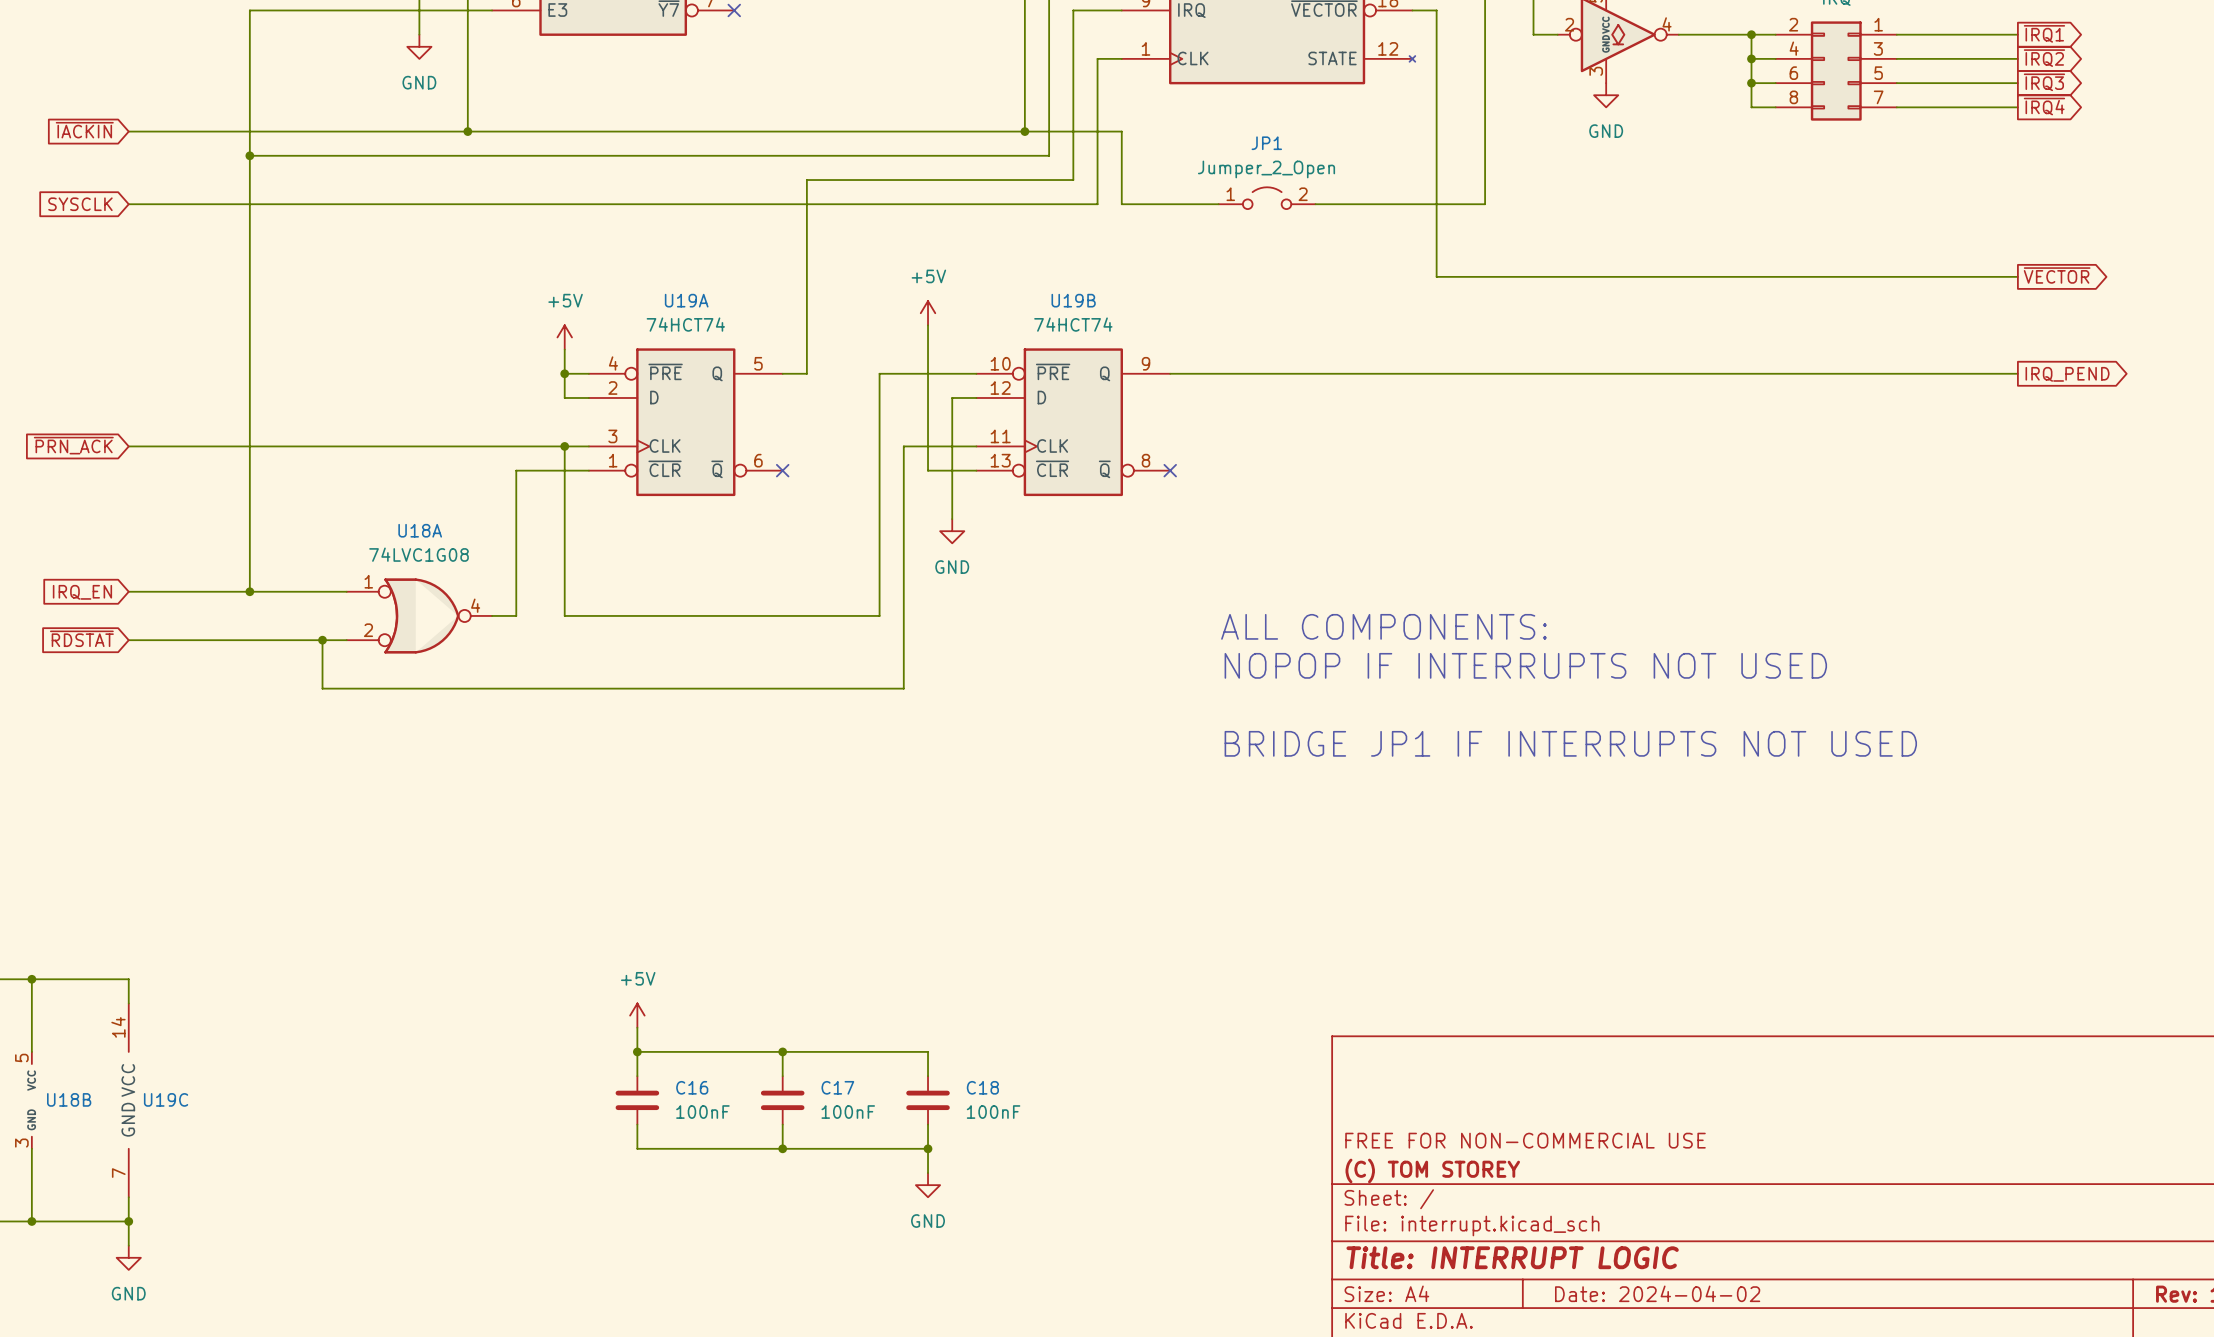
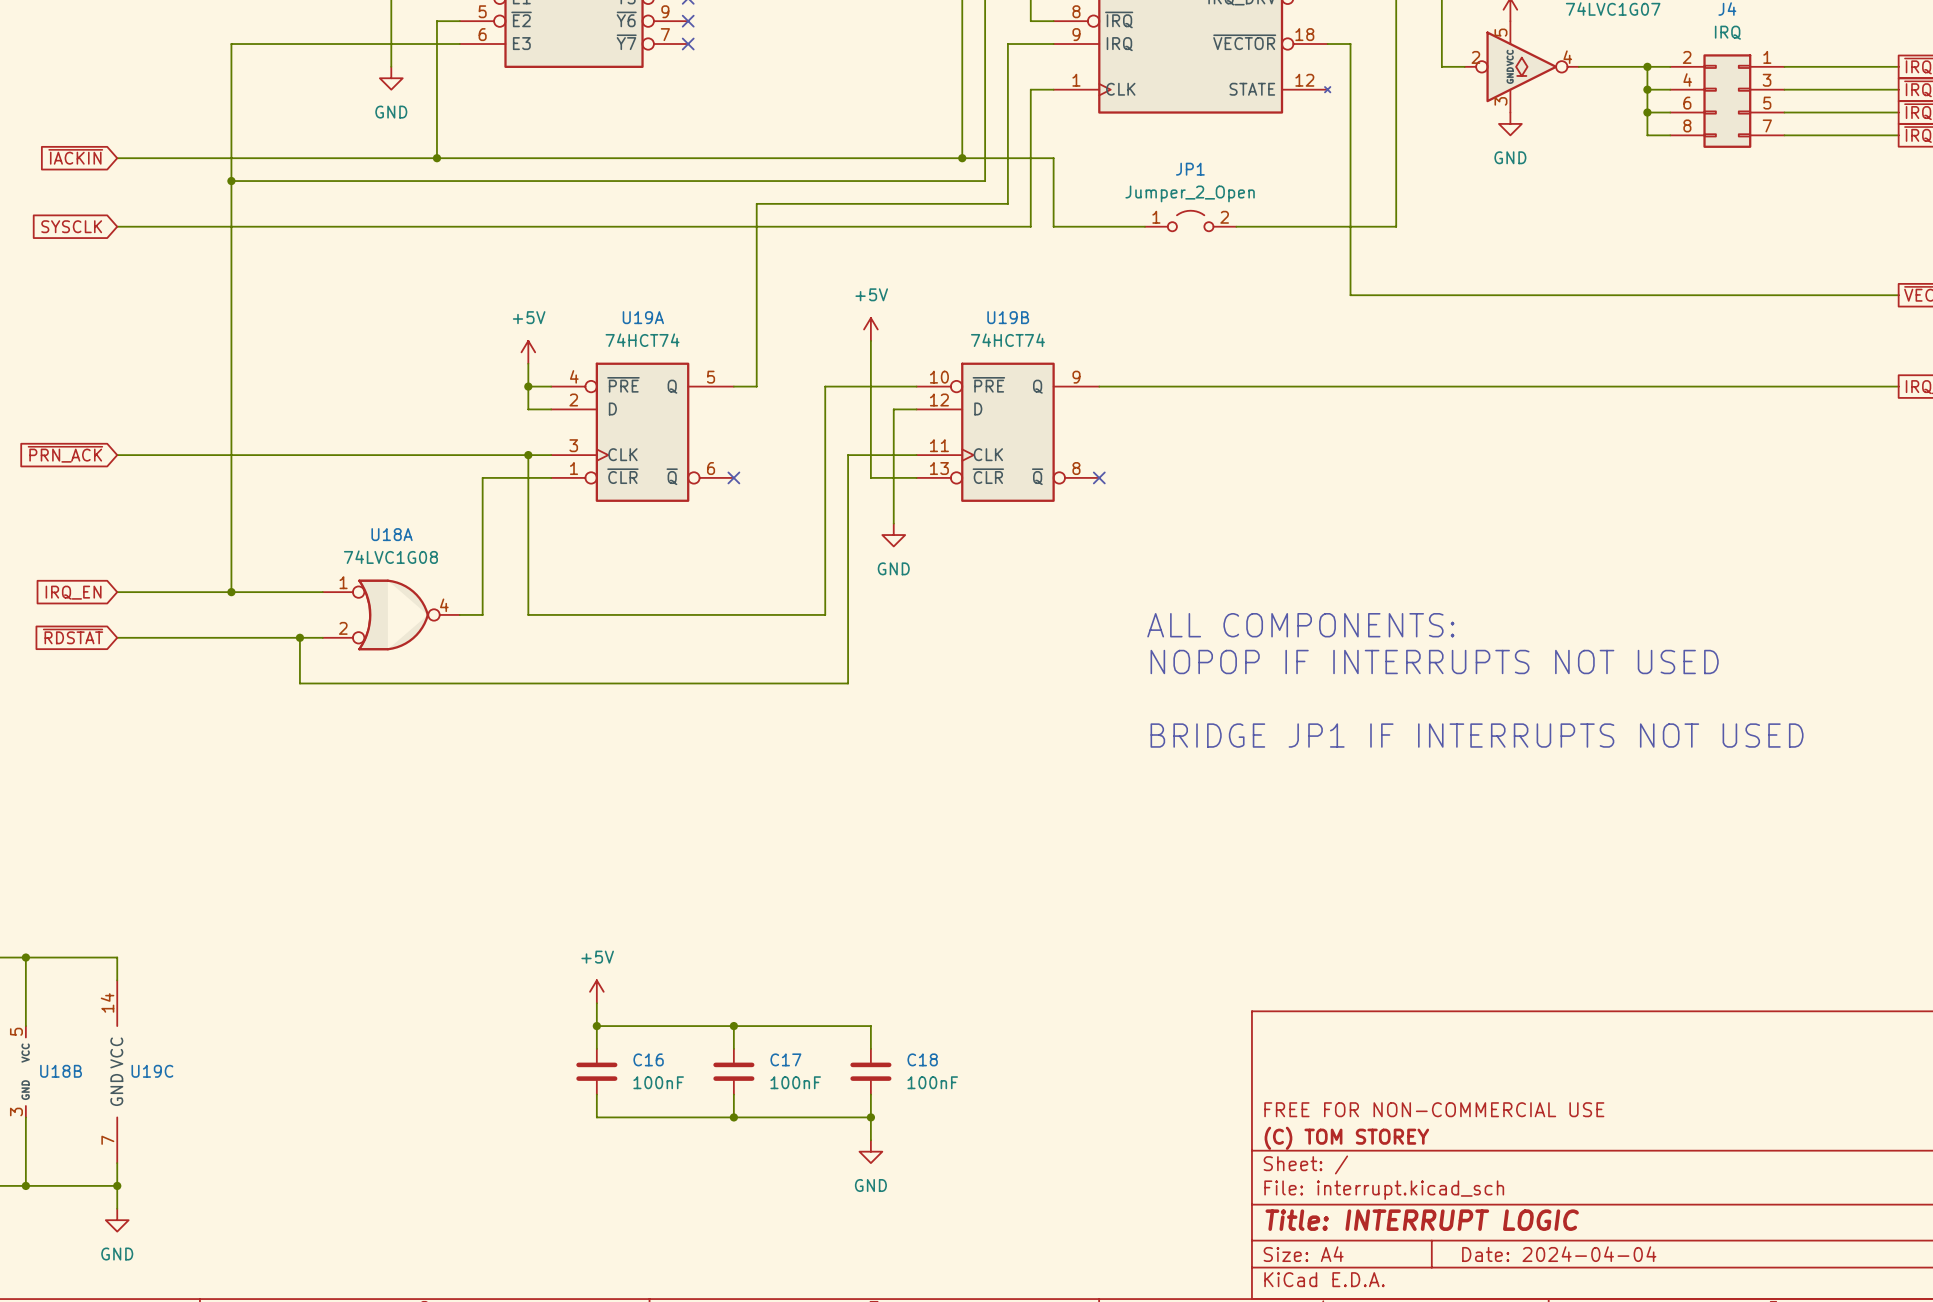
title block: Date: 2024-04-02 (1657, 1293) -> Date: 2024-04-04 (1559, 1254)

